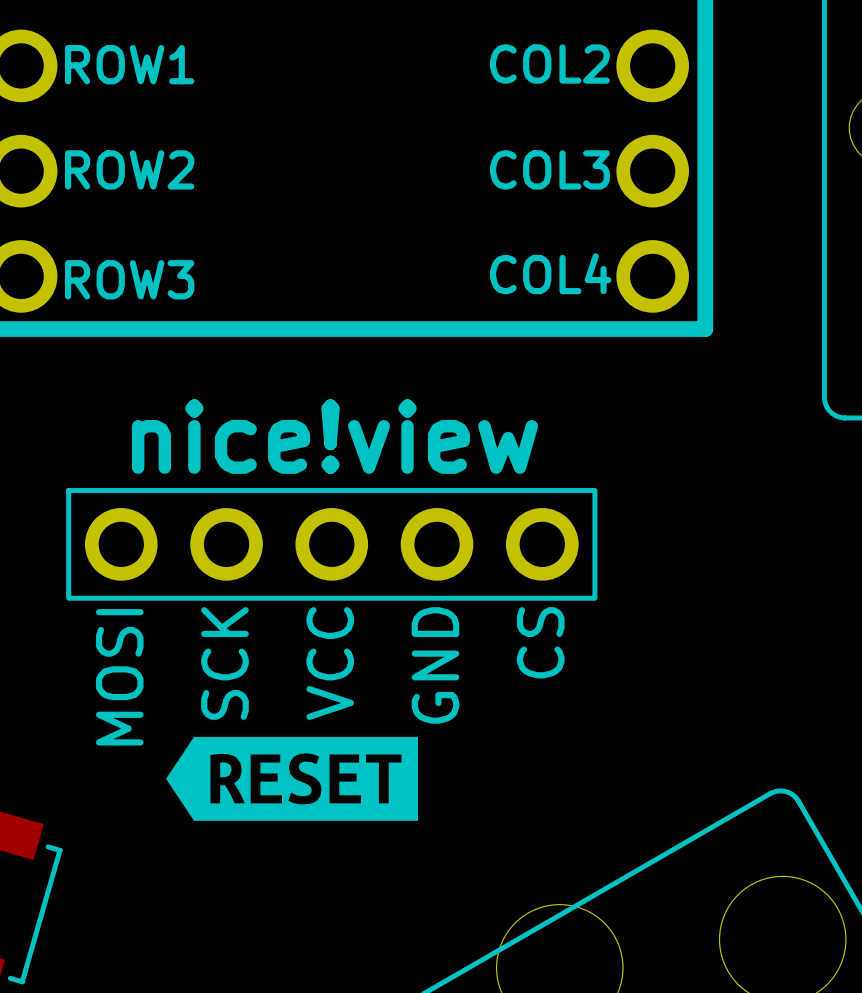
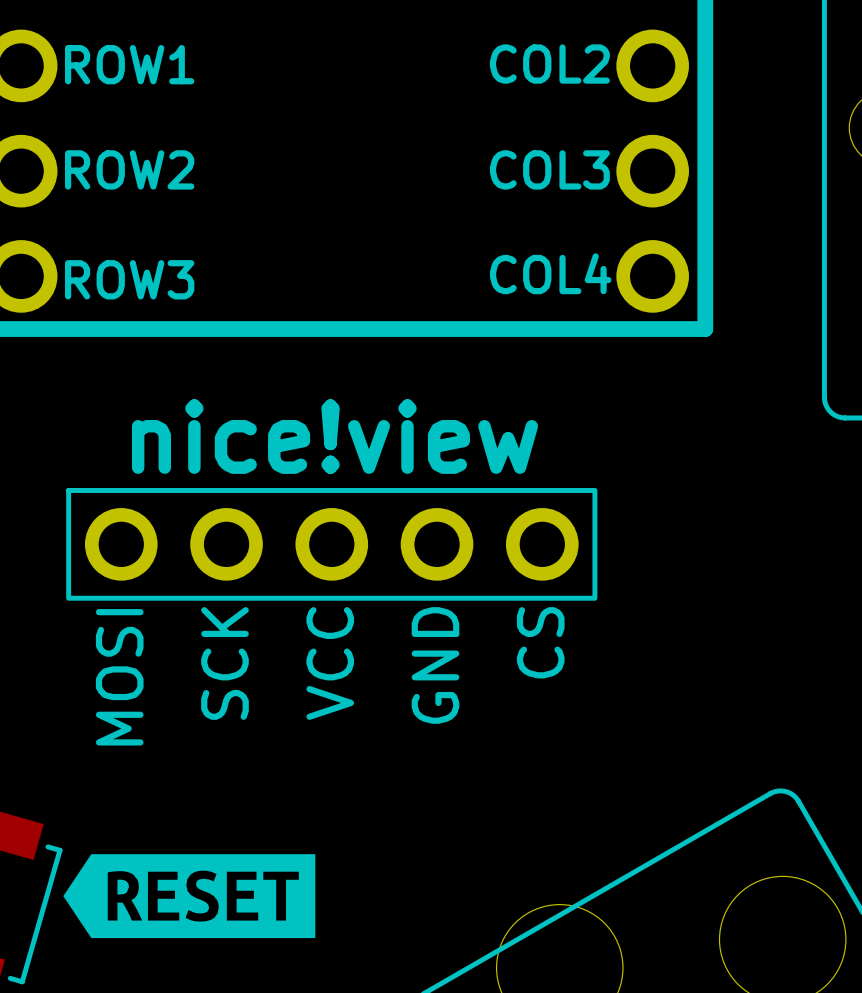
drawing position: (292, 778) -> (189, 896)

